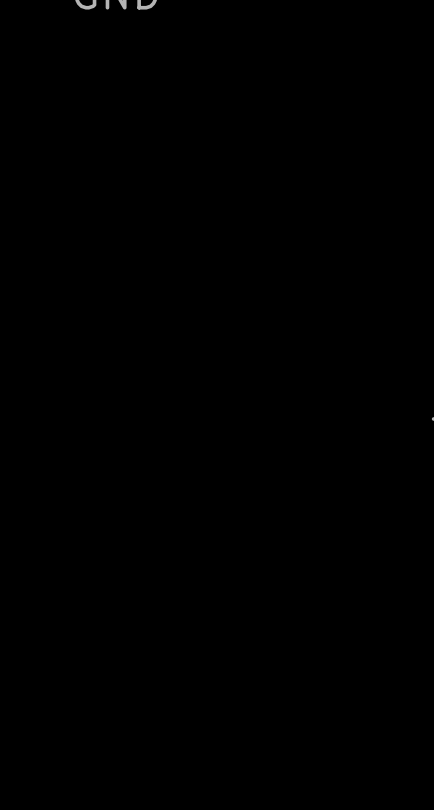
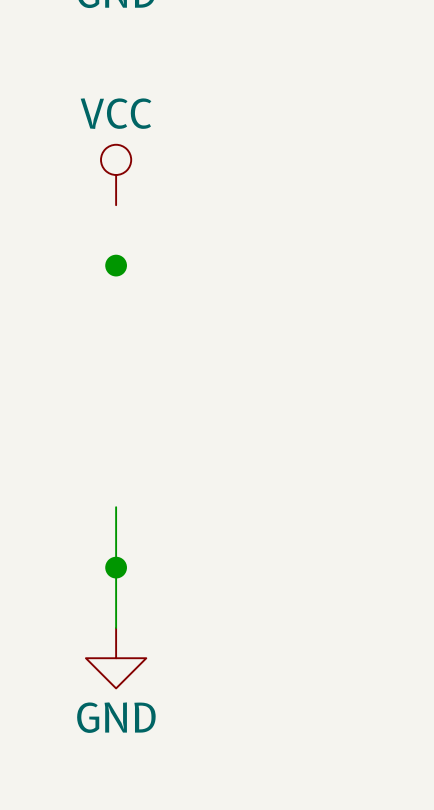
power symbol: none -> VCC (116, 174)
junction: none -> (116, 265)
wire: none -> (116, 507) (116, 628)
junction: none -> (116, 567)
power symbol: none -> GND (116, 658)

